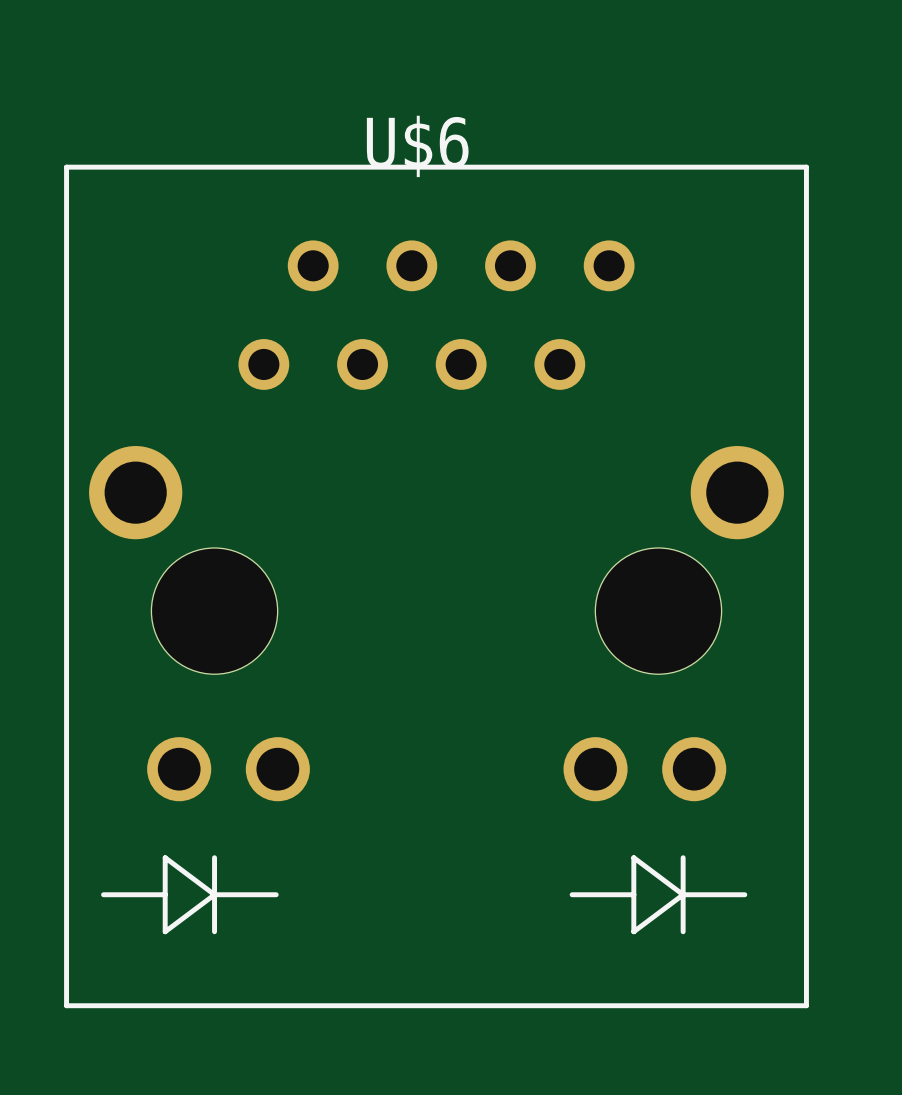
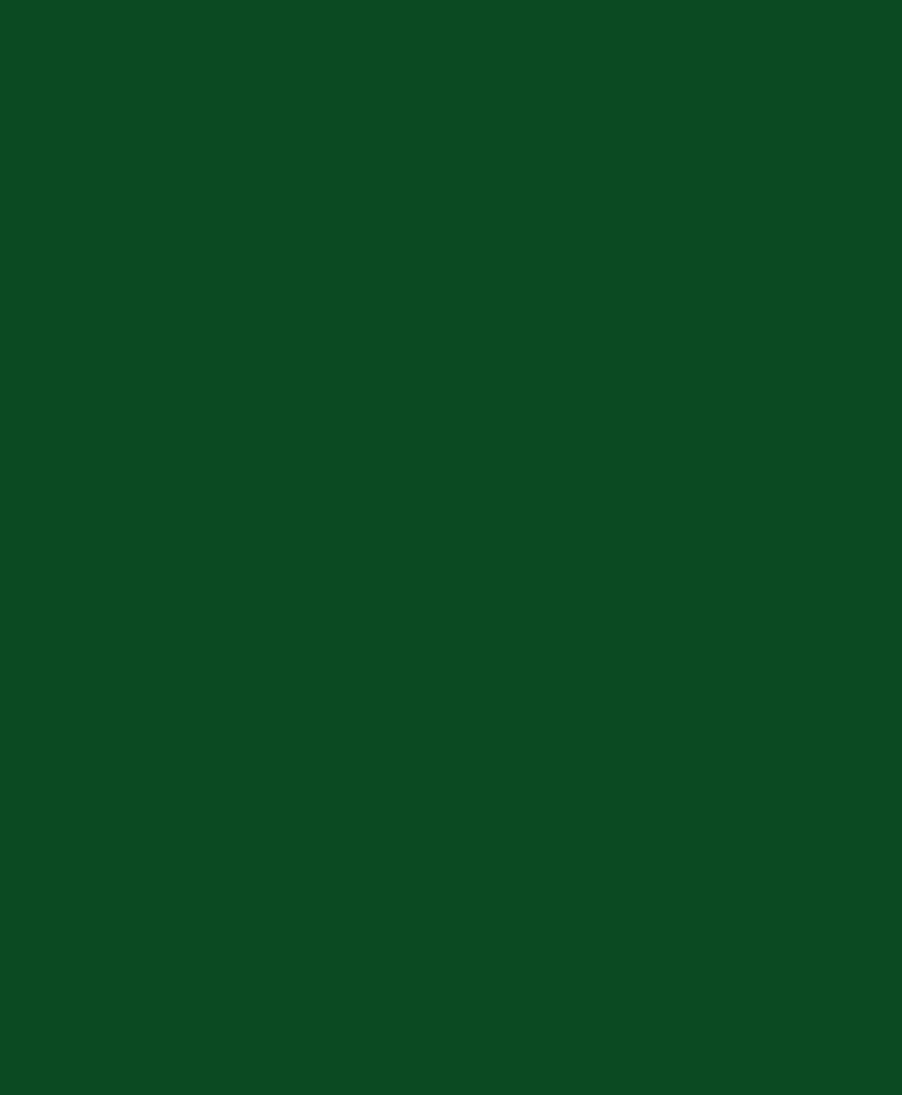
U$6: (436, 586) -> none

